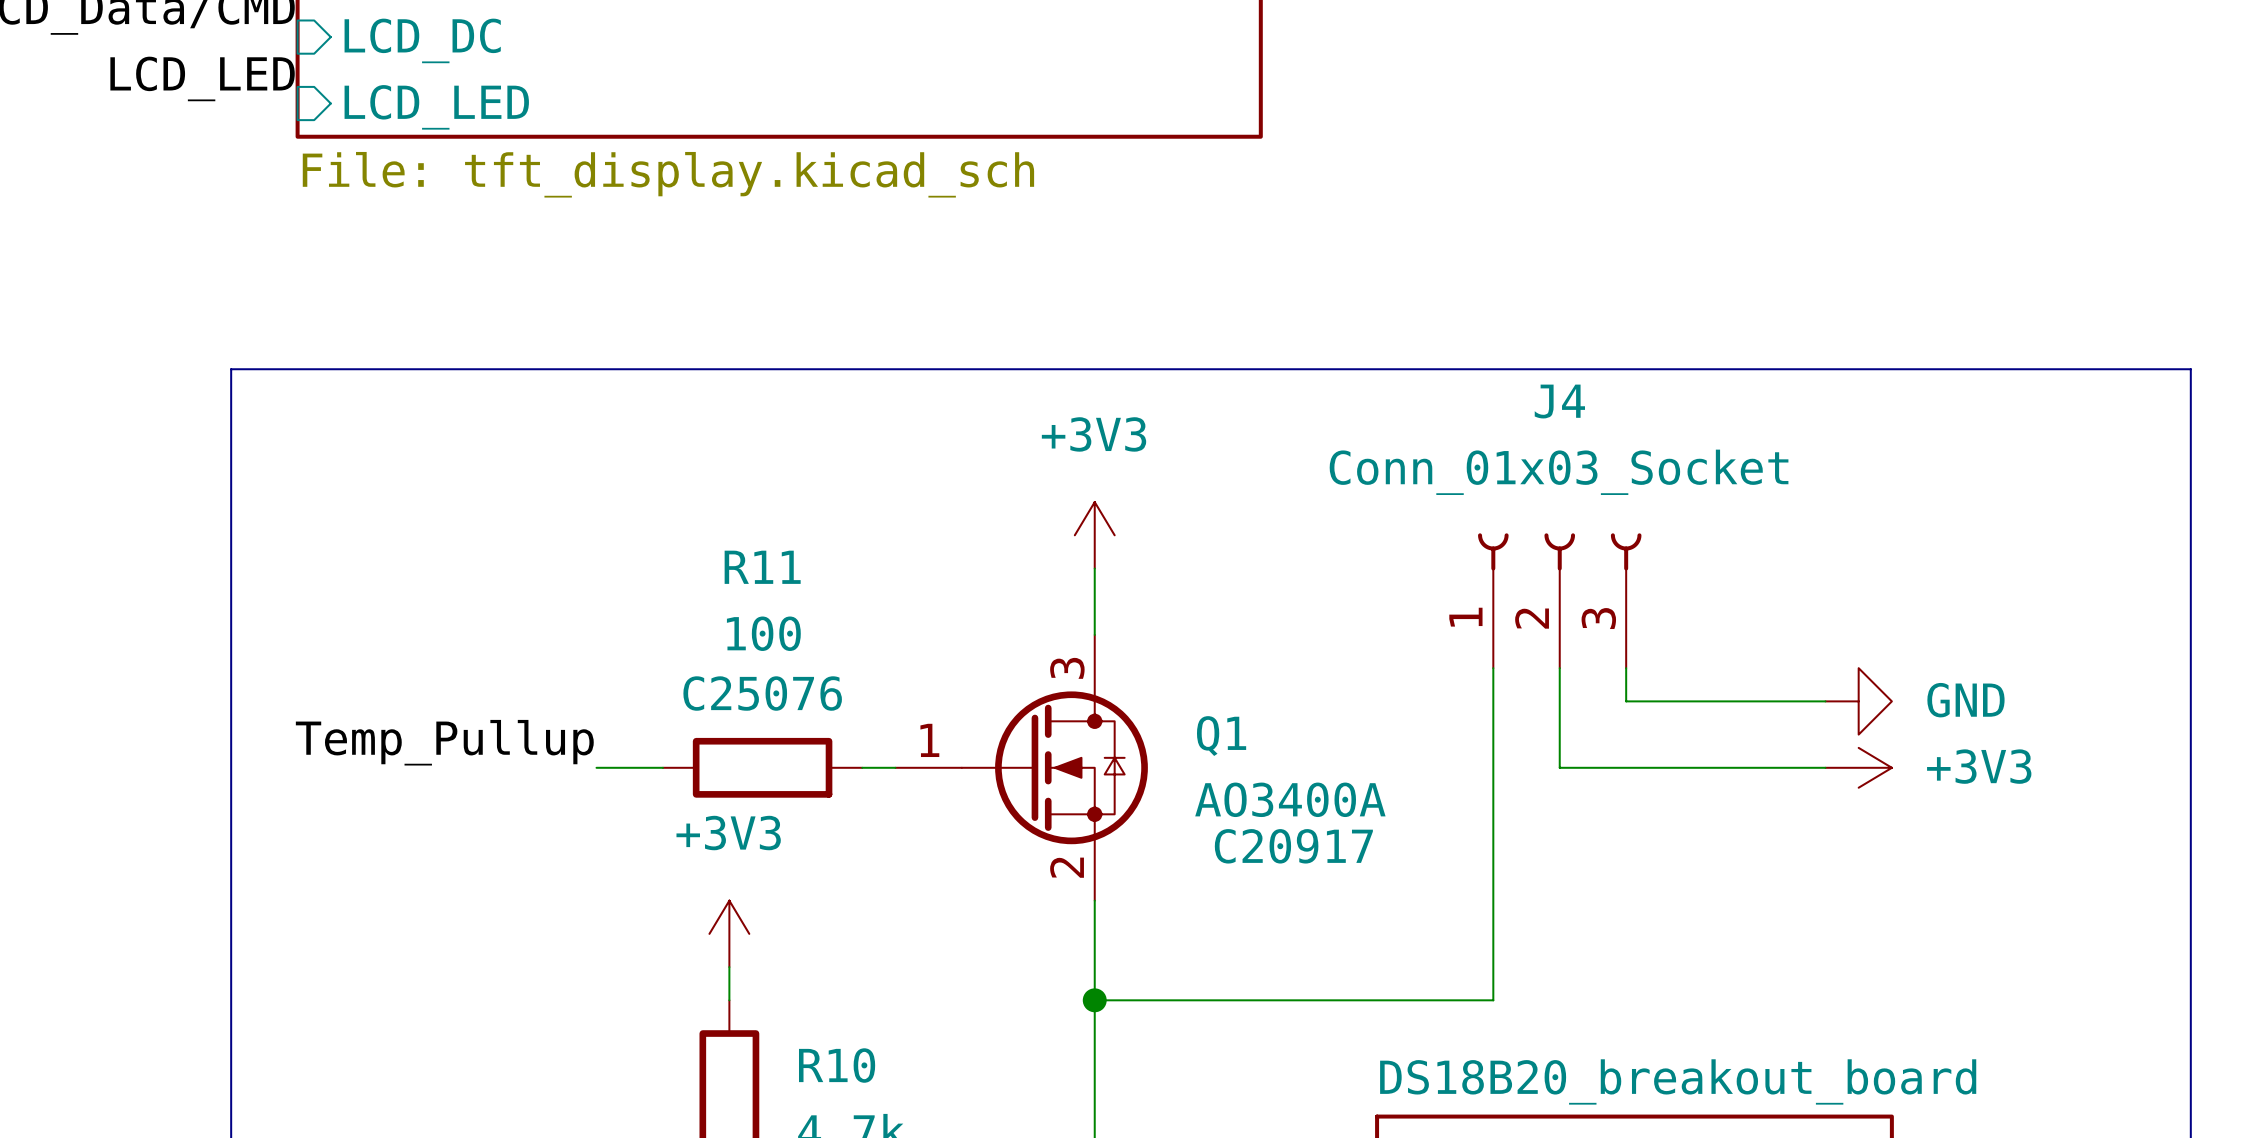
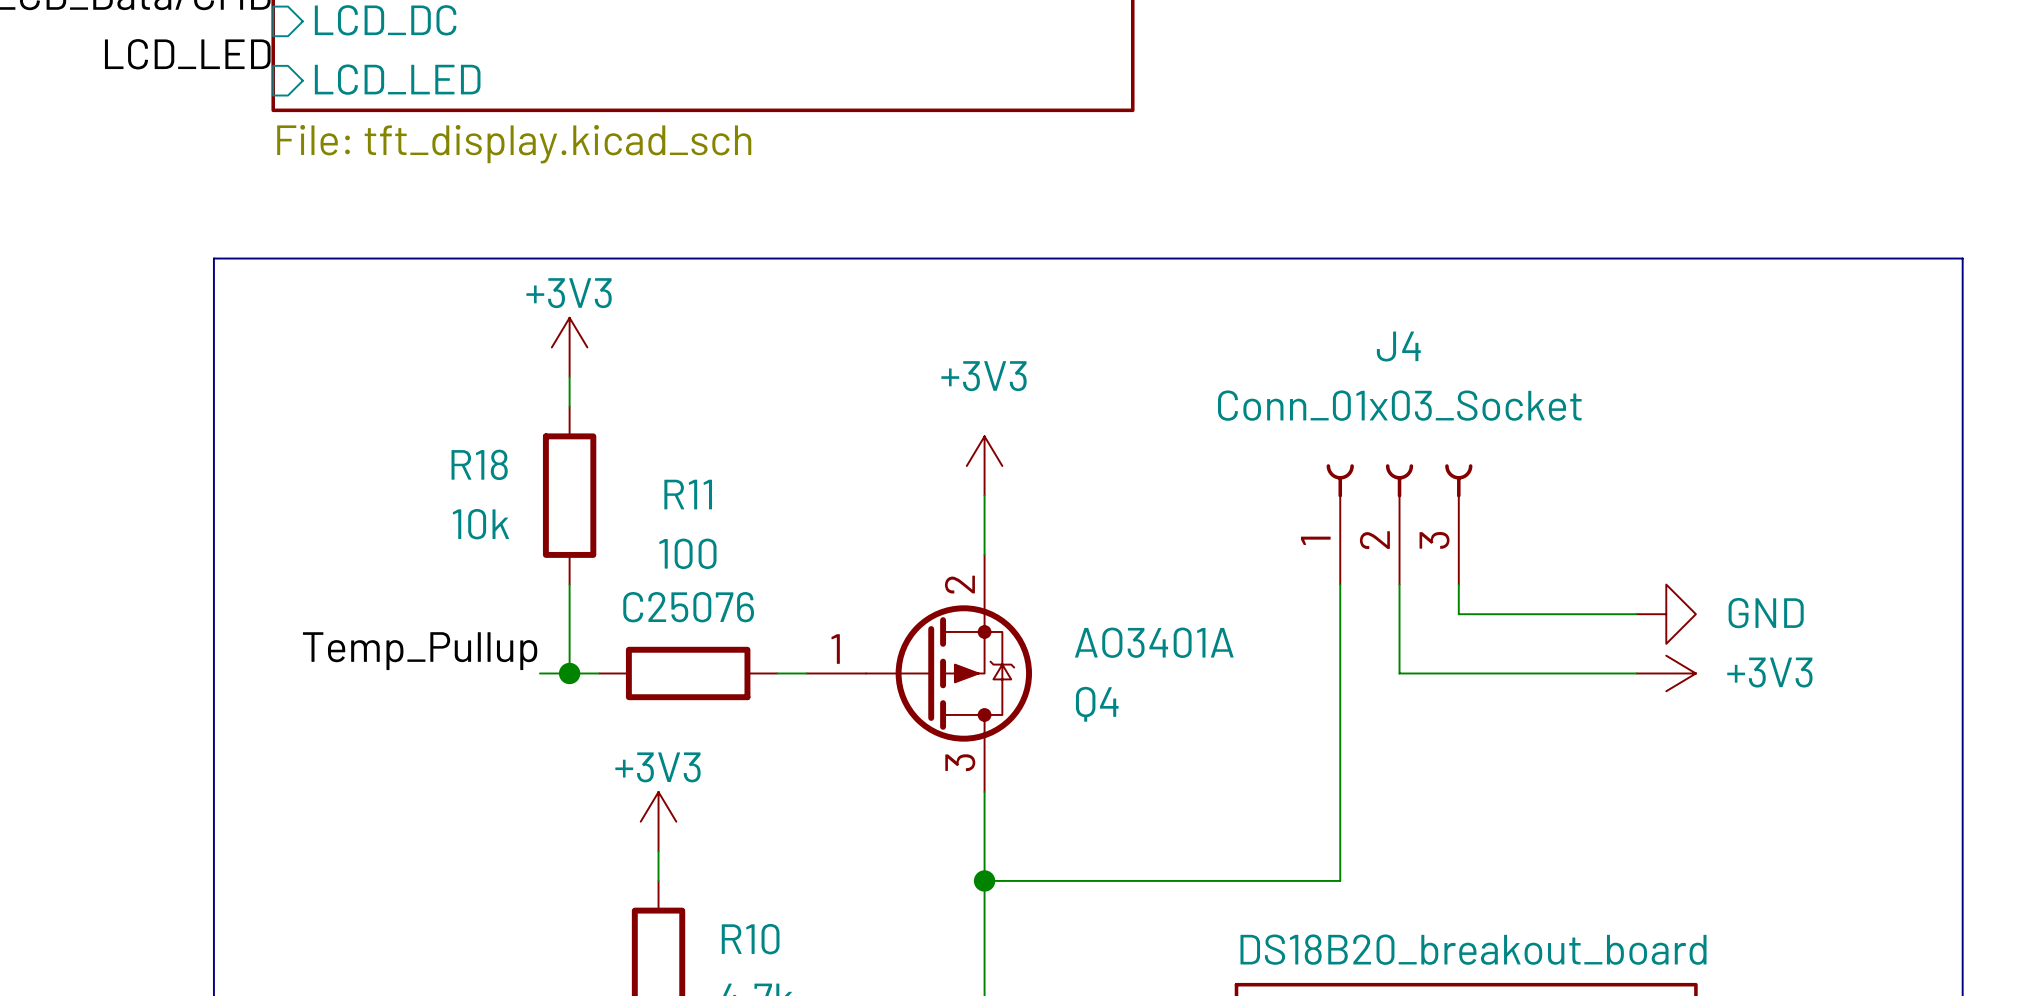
line: (231, 369) (2190, 369) -> (213, 317) (213, 258) (1962, 258) (1962, 317)
power symbol: none -> +3V3 (569, 347)
wire: none -> (569, 377) (569, 406)
R18: none -> 10k (569, 495)
wire: none -> (569, 584) (569, 673)
junction: none -> (569, 673)
Q1: AO3400A (1021, 767) -> none
Q4: none -> AO3401A (919, 673)
power symbol text position: +3V3 (728, 833) -> +3V3 (657, 767)

